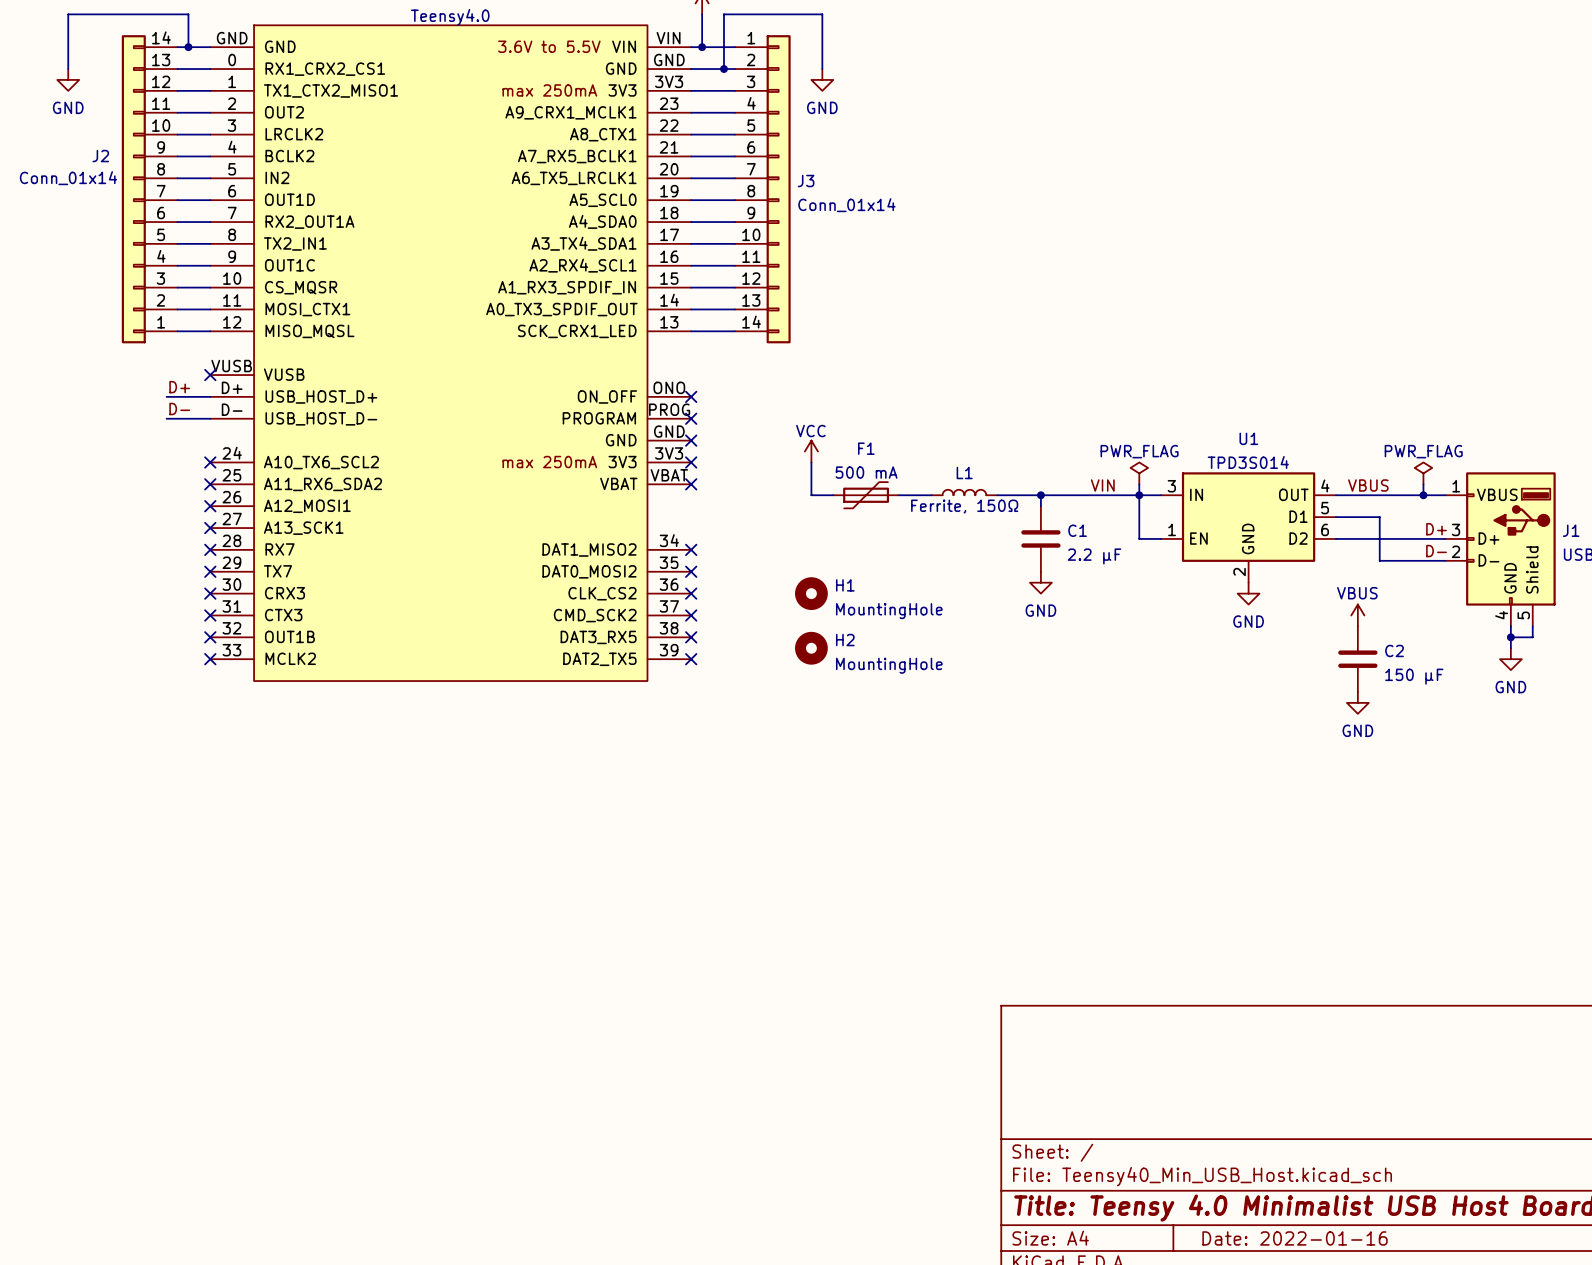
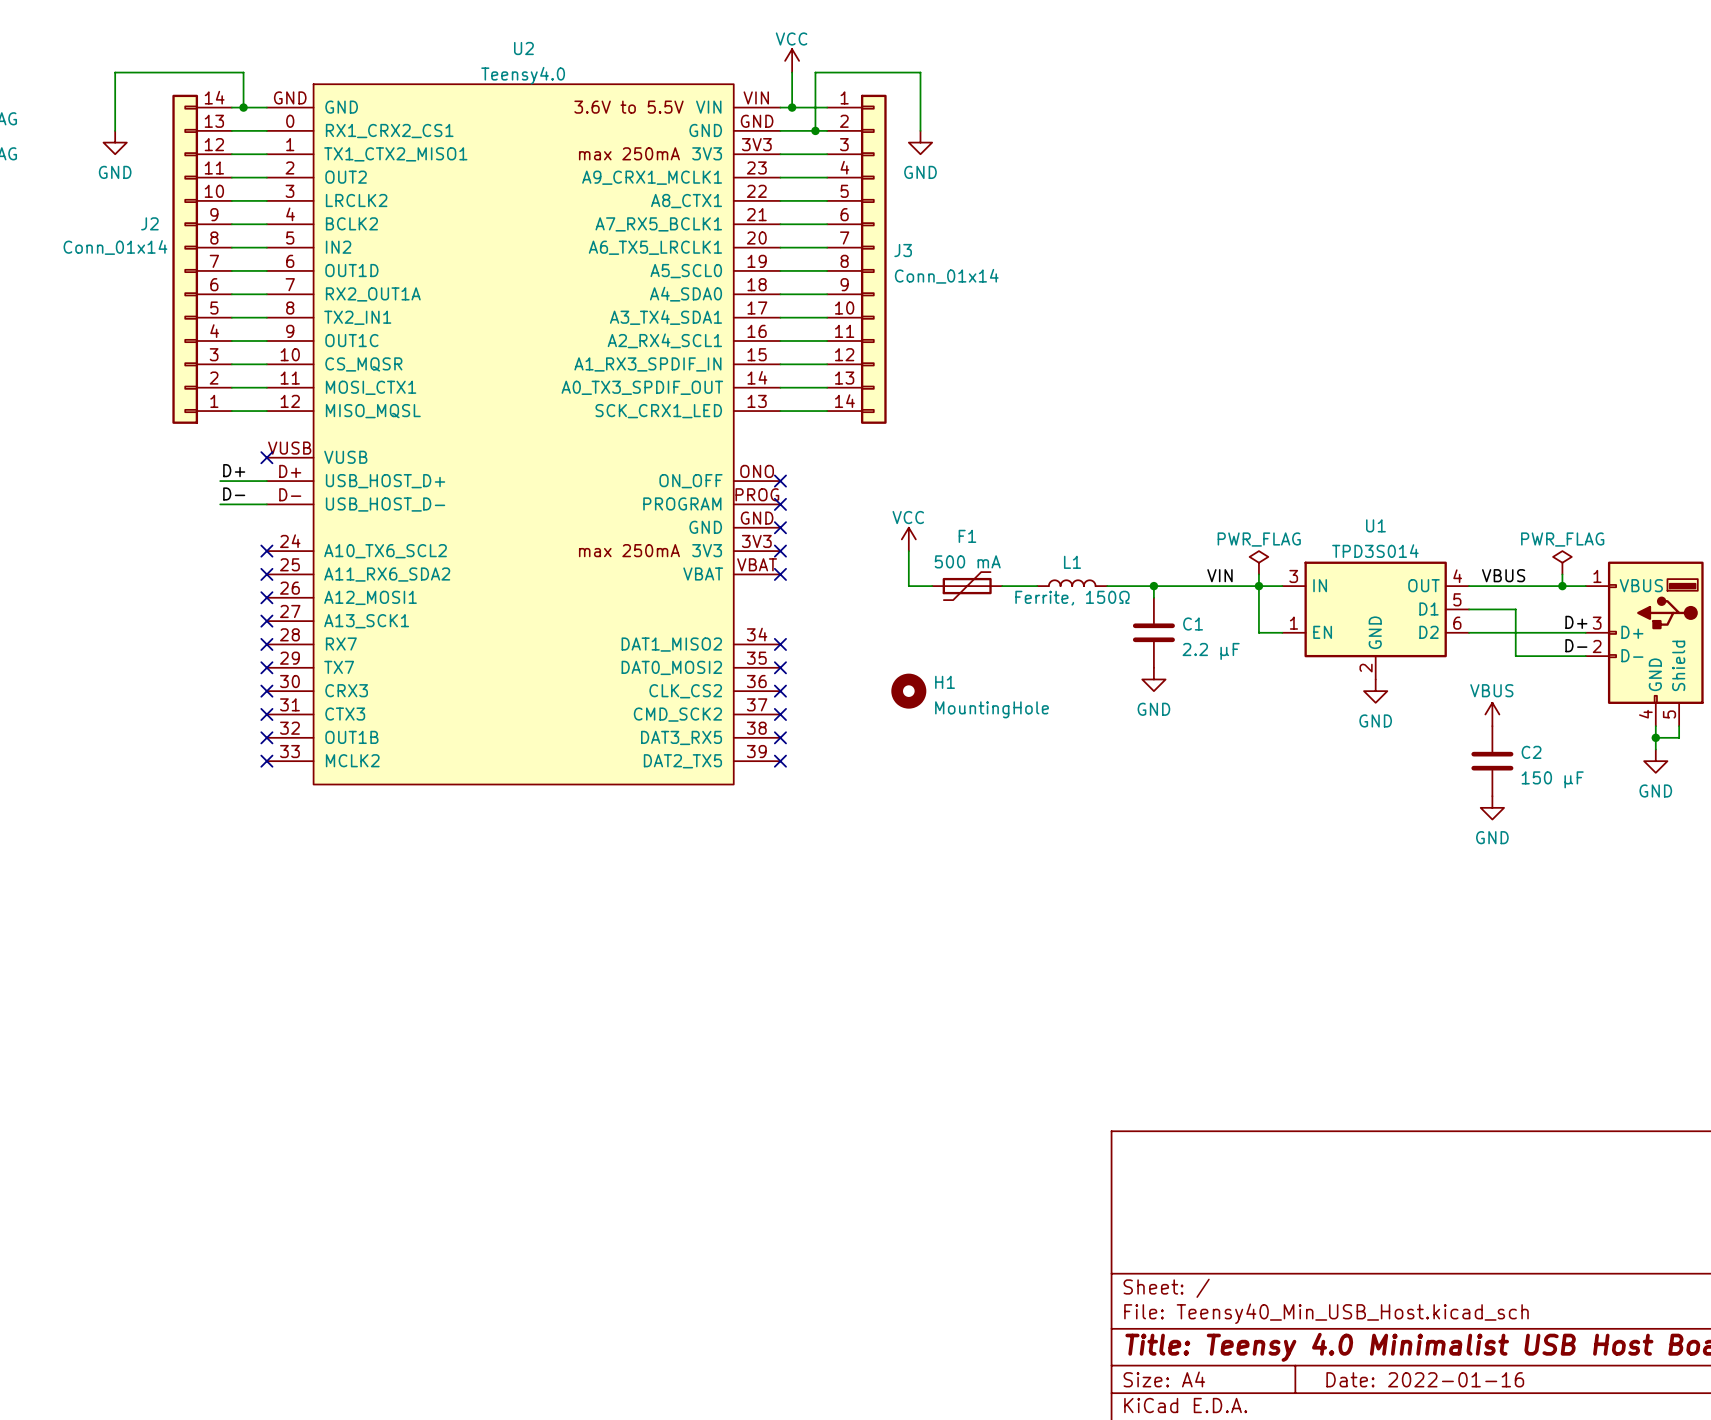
H2: MountingHole (811, 648) -> none

